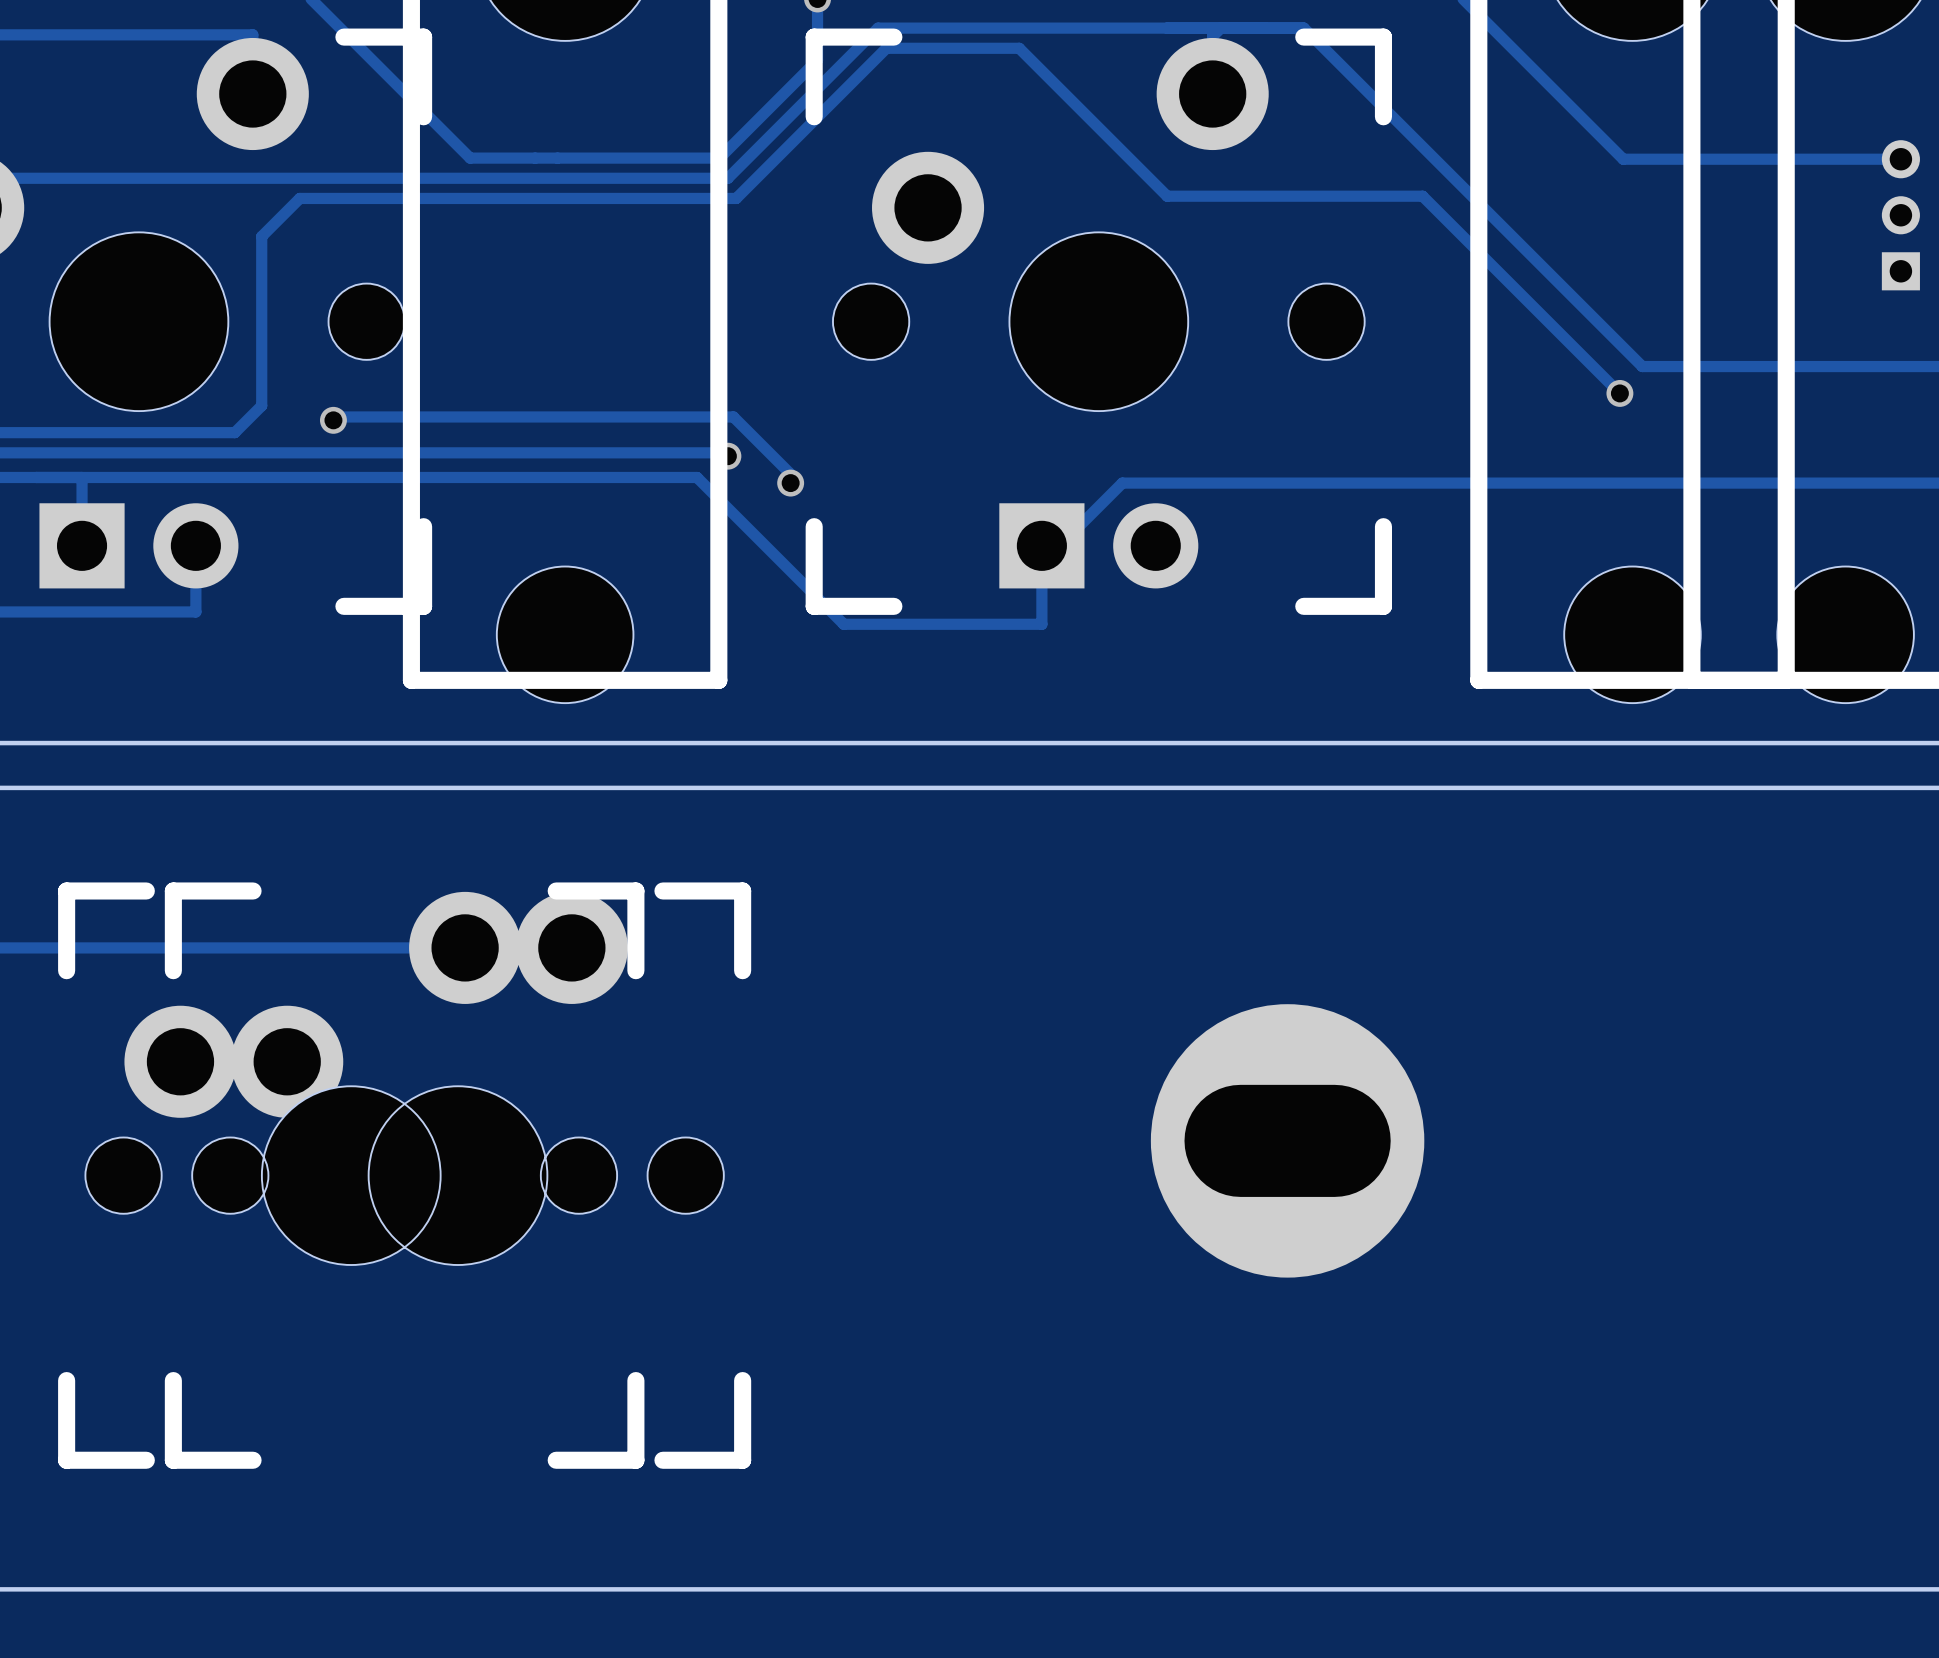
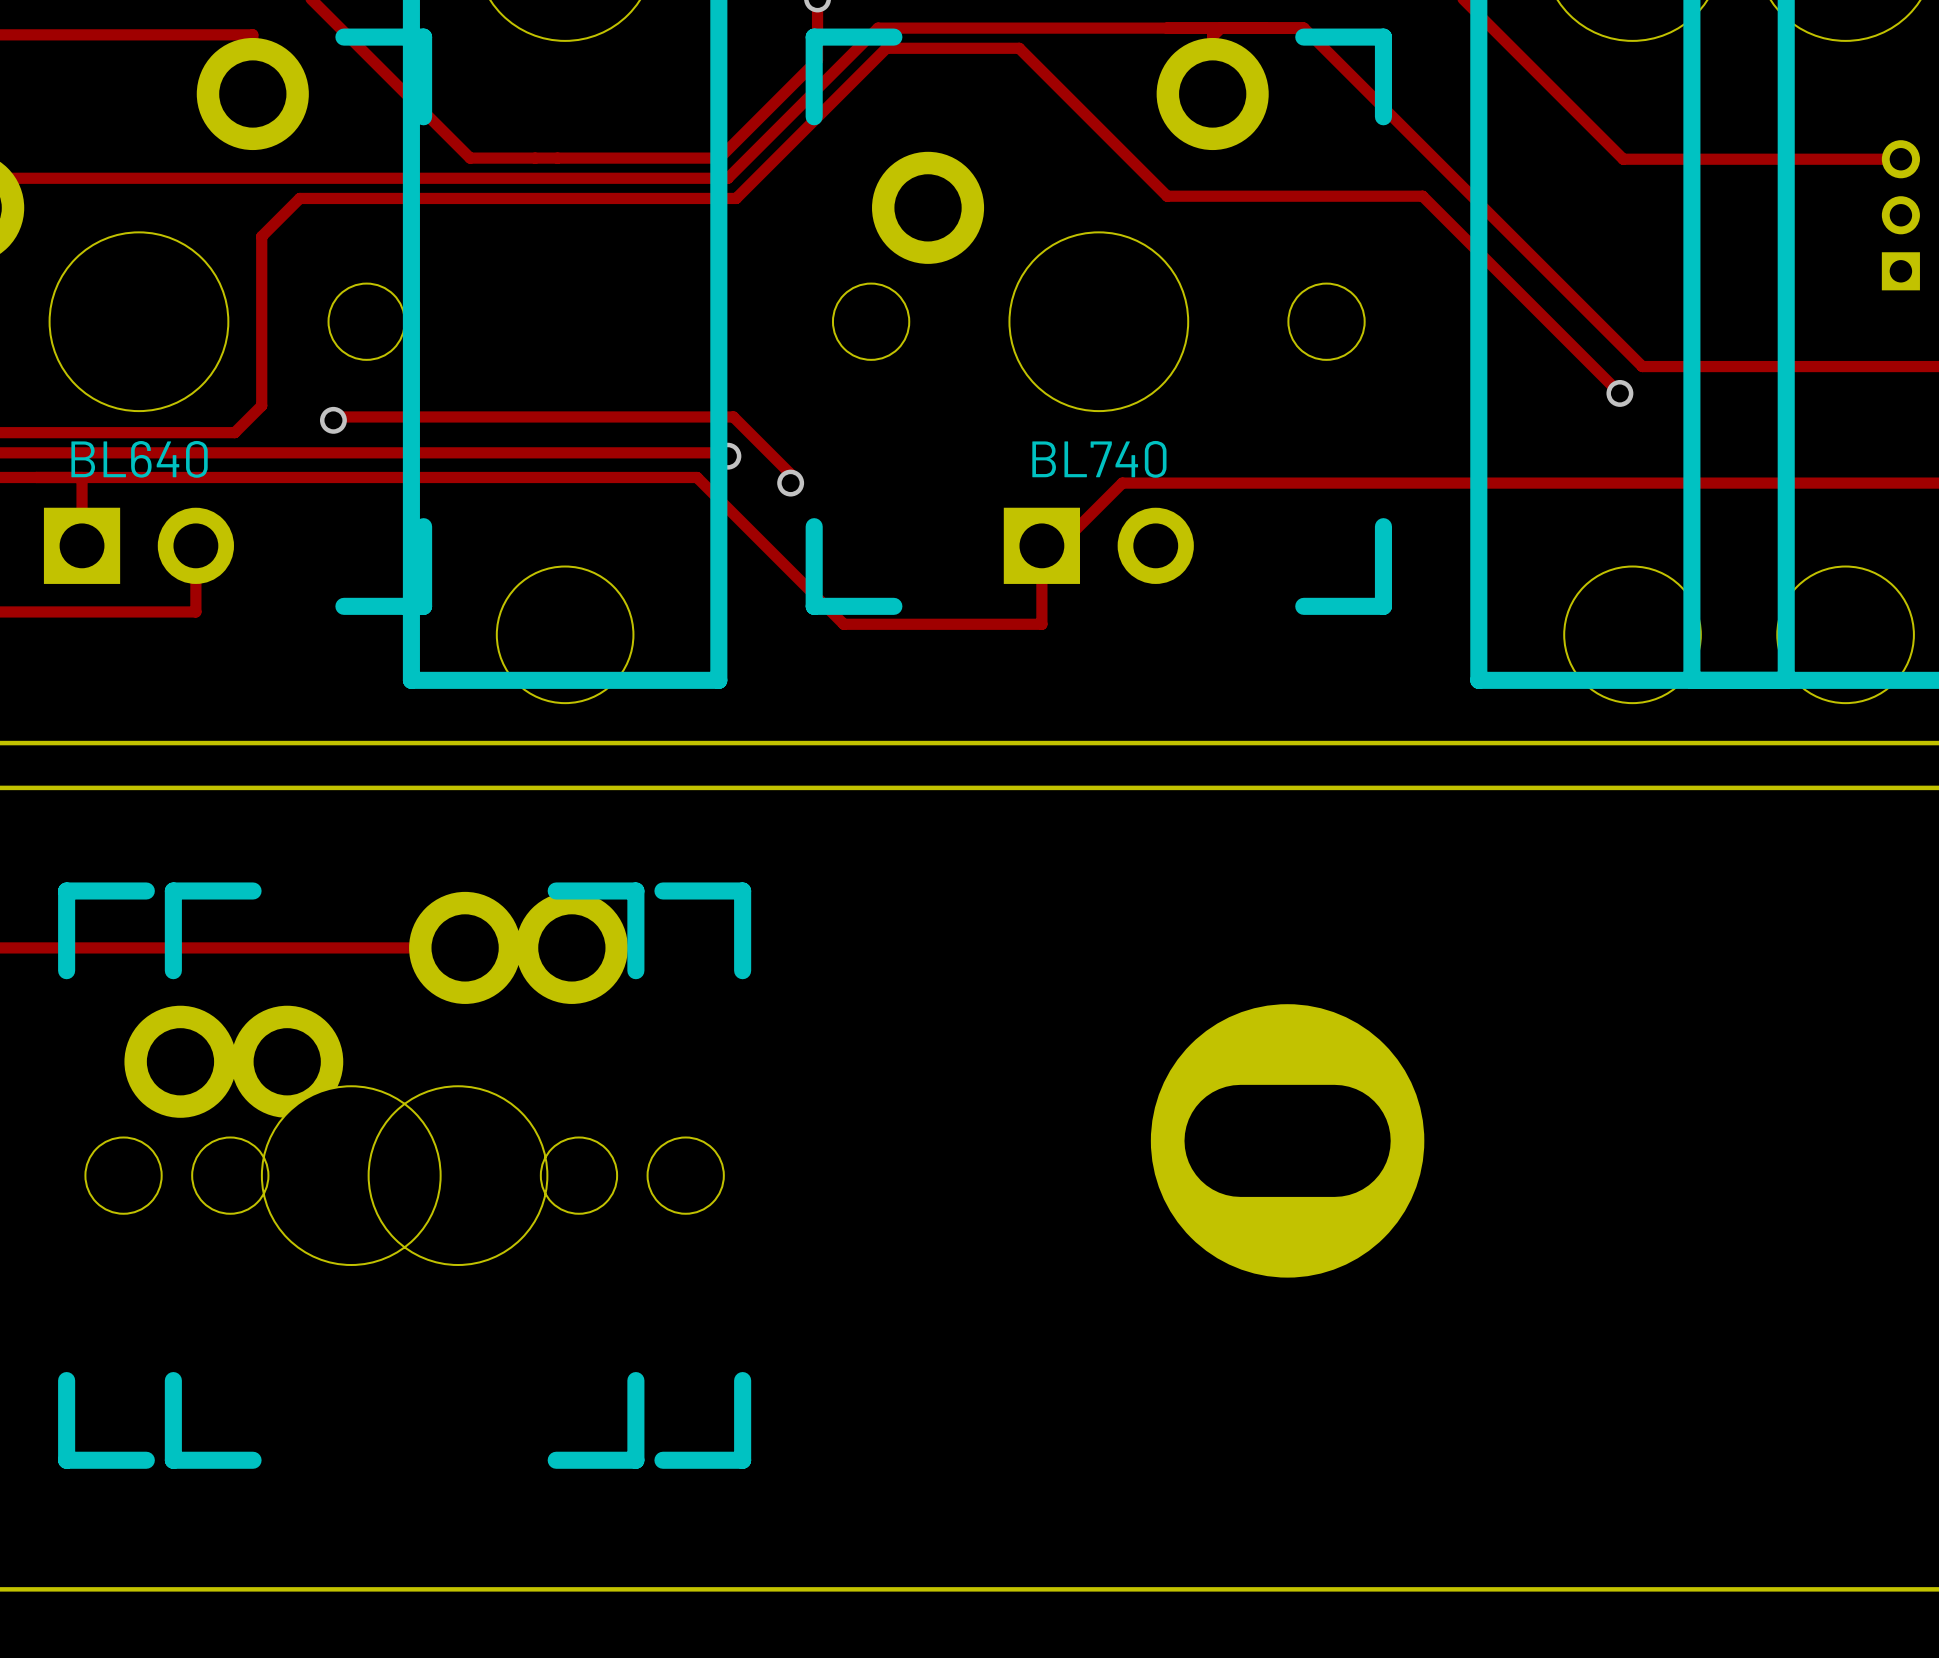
part: (138, 545) -> none
BL640: none -> (138, 545)
part: (1098, 545) -> none
BL740: none -> (1098, 545)

